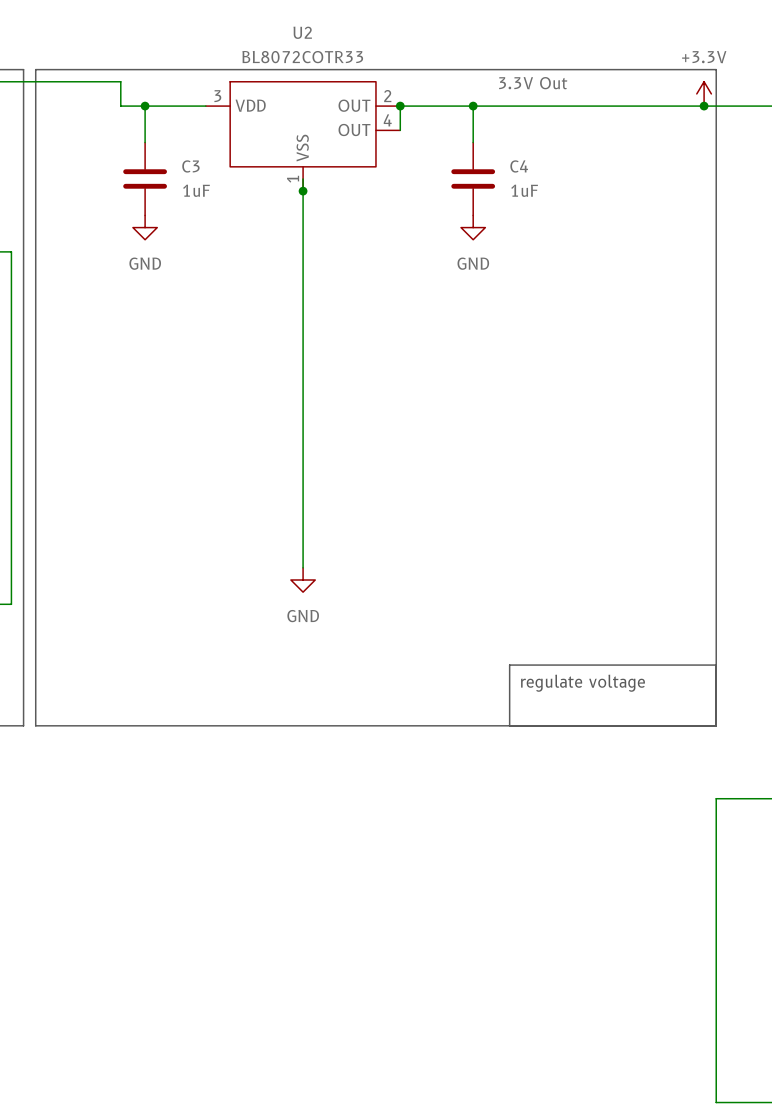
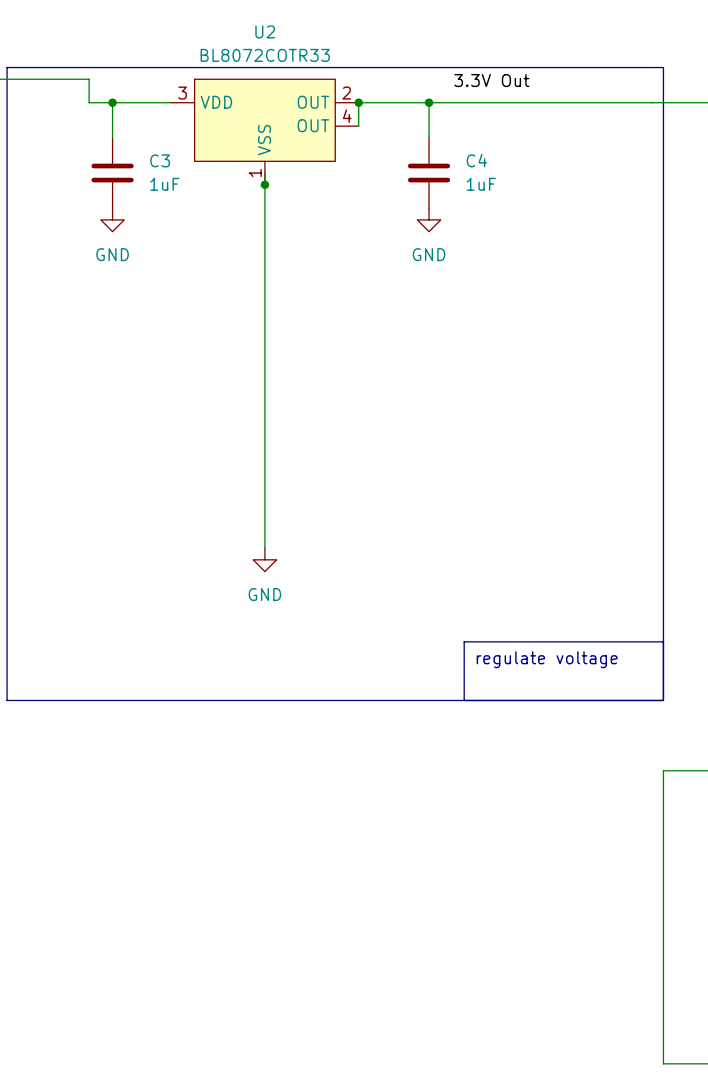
power symbol: +3.3V (704, 93) -> none
junction: (704, 106) -> none

